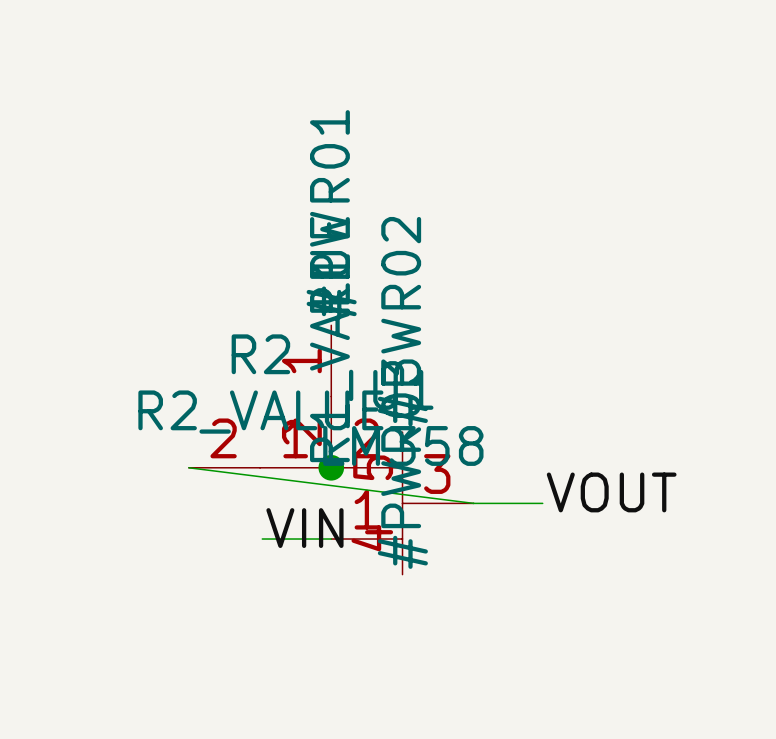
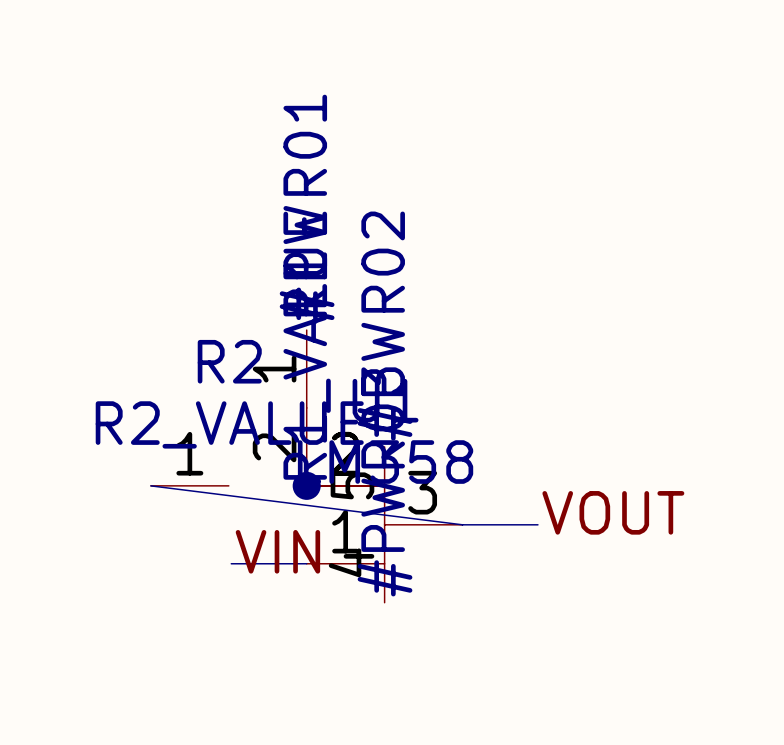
R2 symbol: [188, 467, 332, 468] -> [150, 485, 385, 486]

